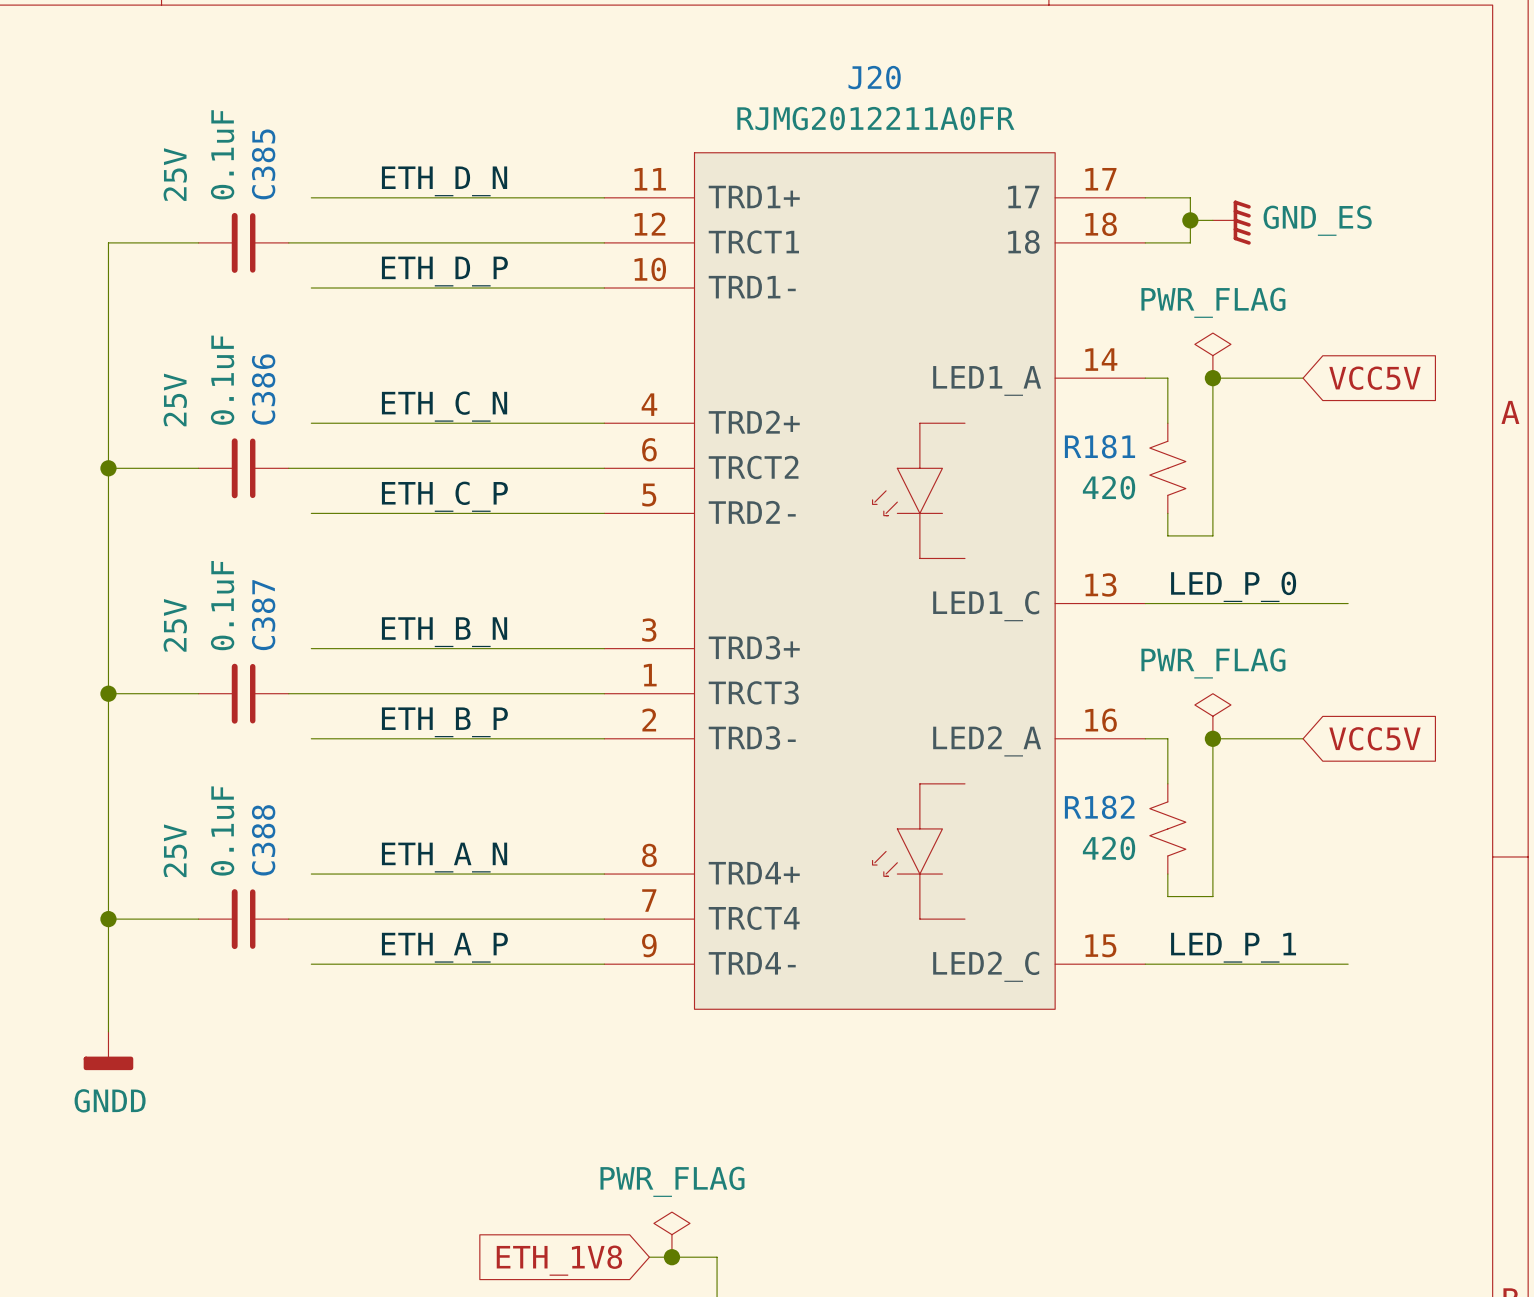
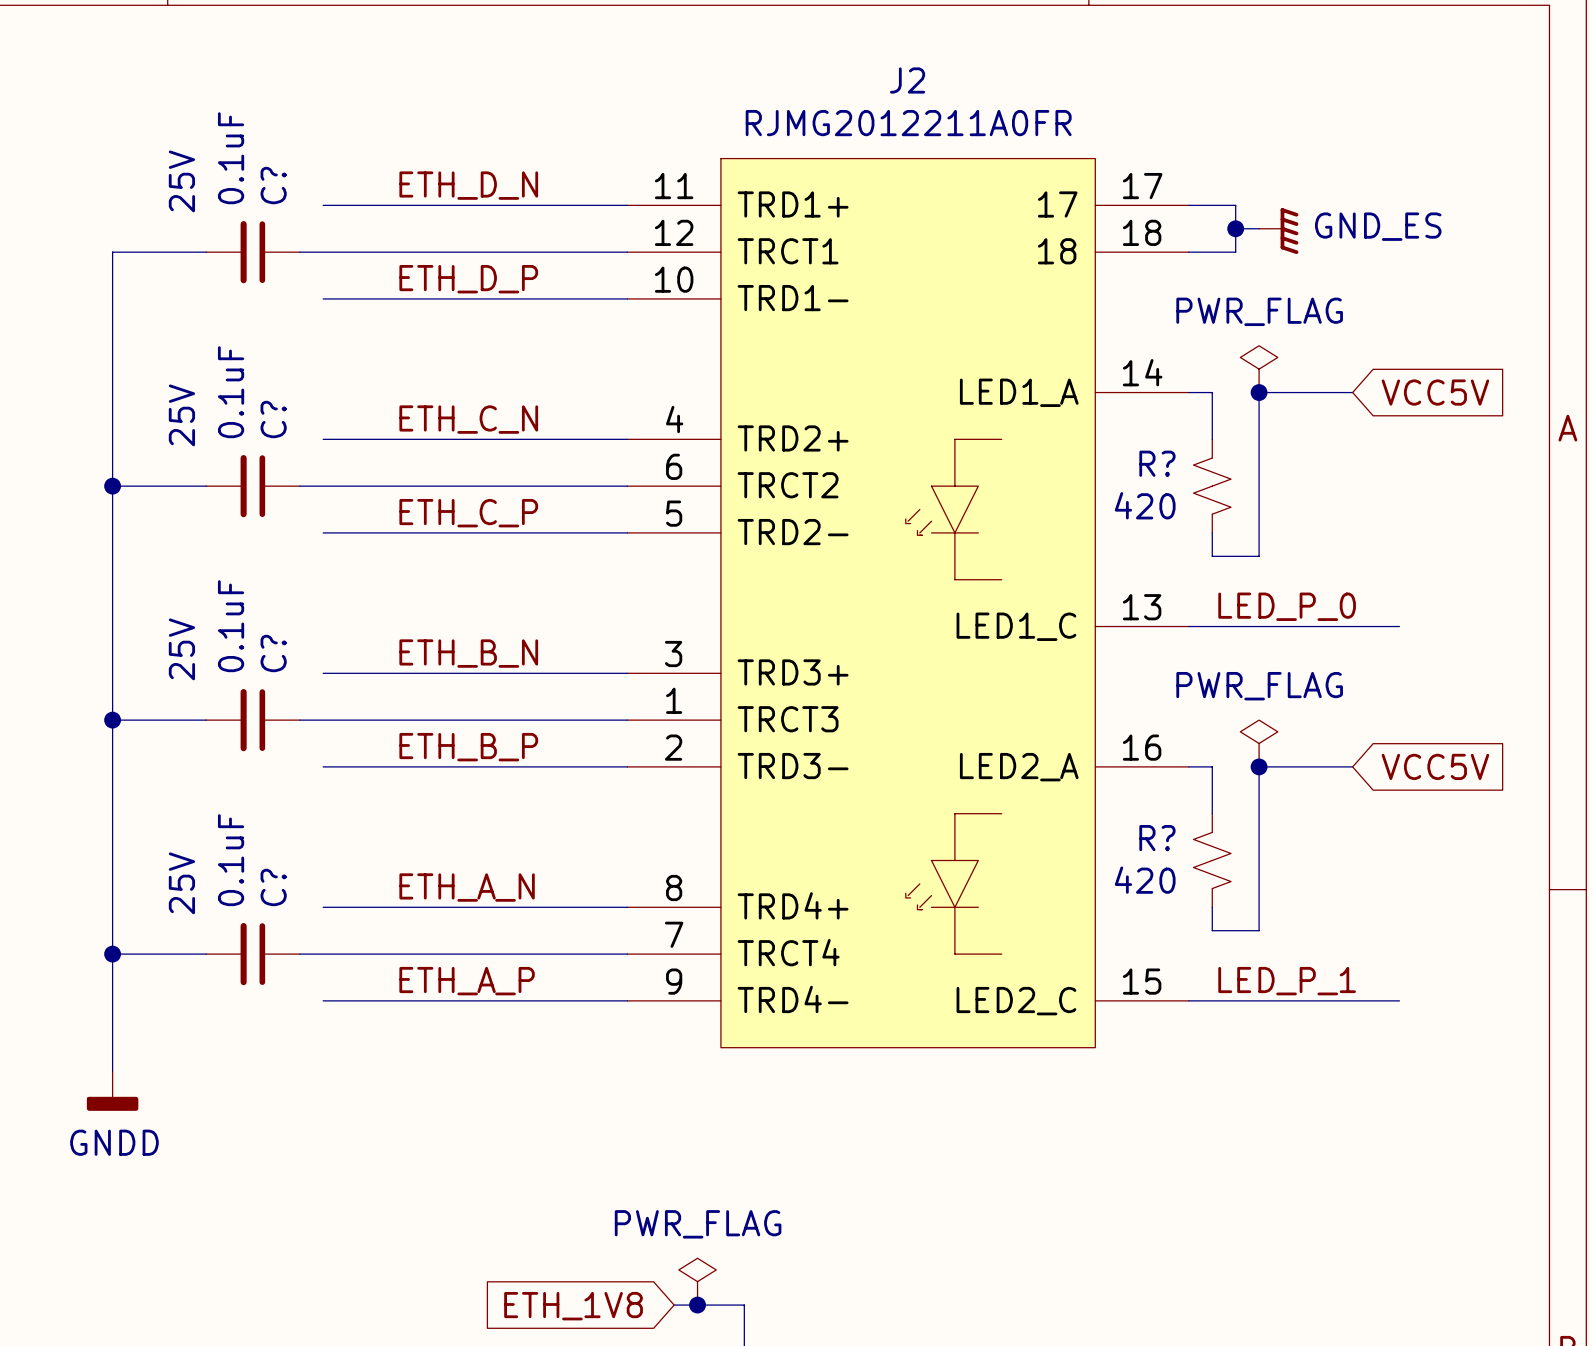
J20 name: J20 (874, 77) -> J2 (907, 80)
C385 name: C385 (263, 164) -> C? (273, 185)
C386 name: C386 (263, 389) -> C? (273, 419)
R181 name: R181 (1099, 446) -> R? (1157, 463)
C387 name: C387 (263, 615) -> C? (273, 653)
R182 name: R182 (1099, 807) -> R? (1157, 838)
C388 name: C388 (263, 840) -> C? (273, 887)

